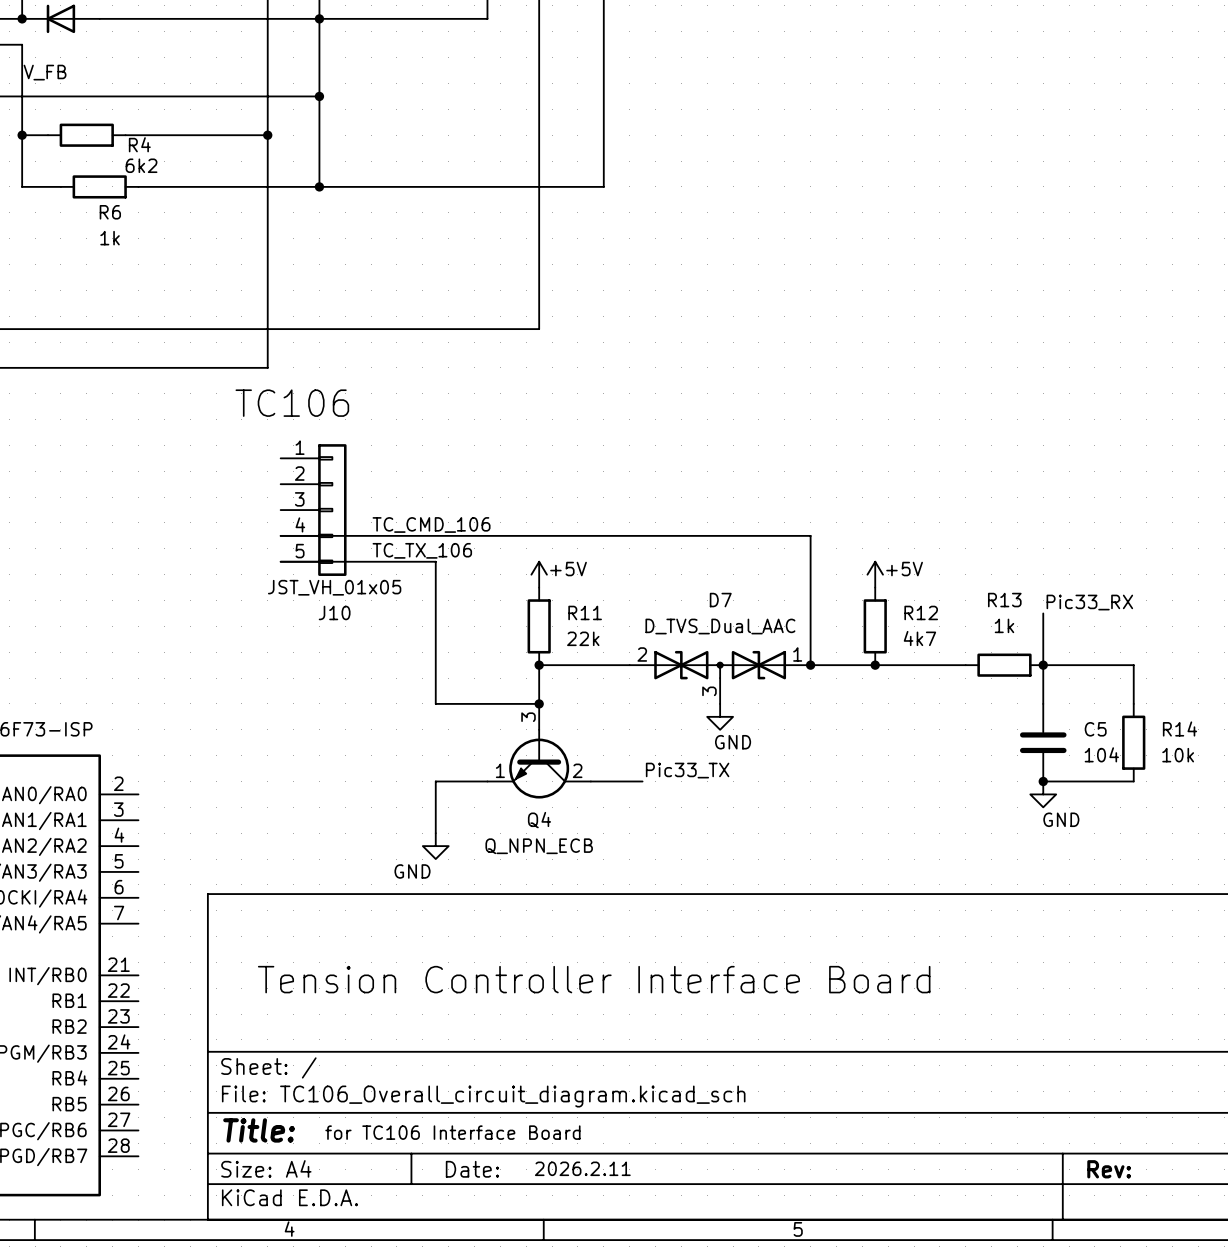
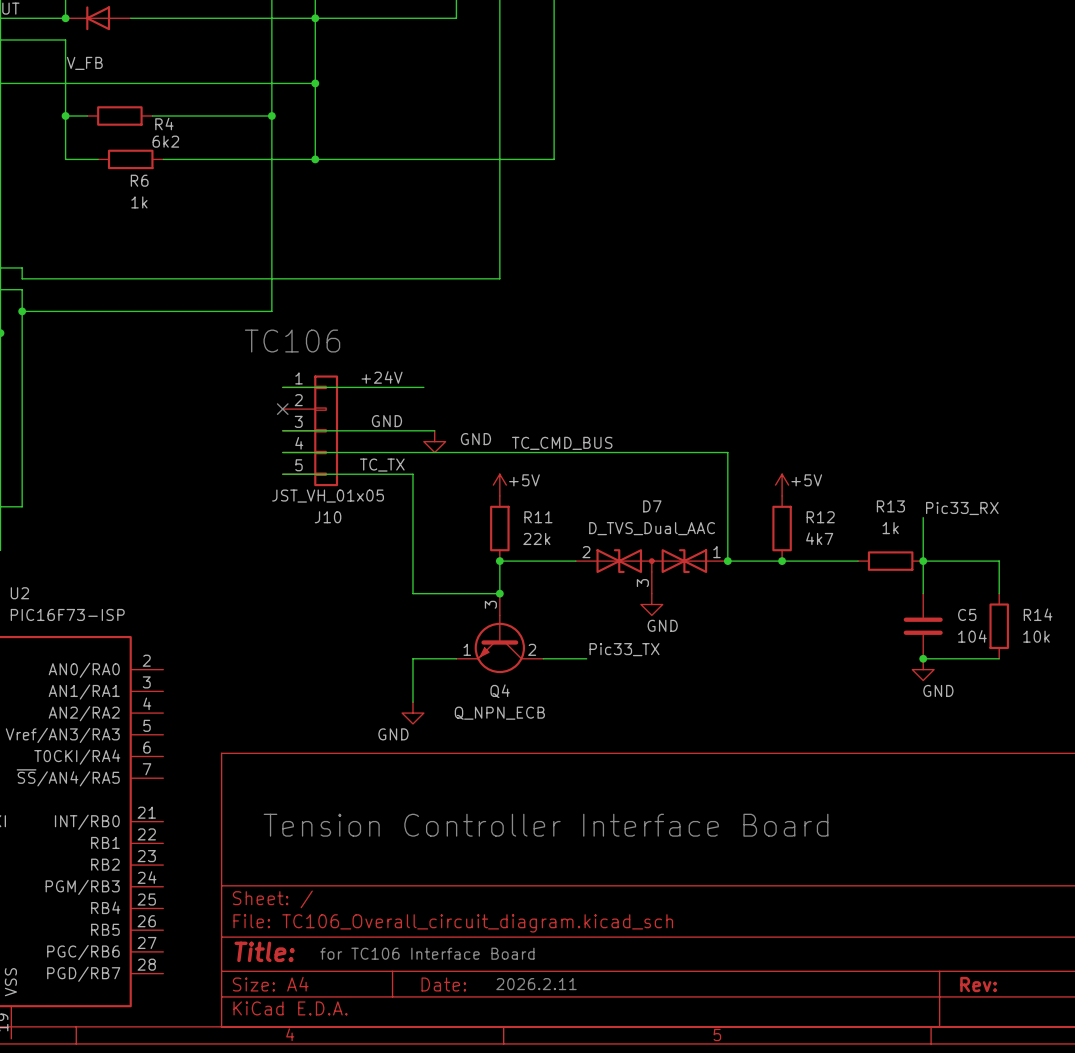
label: none -> +24V (382, 377)
wire: none -> (282, 387) (423, 387)
no-connect mark: none -> (282, 409)
label: none -> GND (386, 421)
wire: none -> (282, 430) (434, 430)
power symbol: none -> GND (434, 441)
label: TC_CMD_106 (431, 524) -> none
label: none -> TC_CMD_BUS (562, 443)
label: TC_TX_106 (422, 550) -> TC_TX (382, 465)

